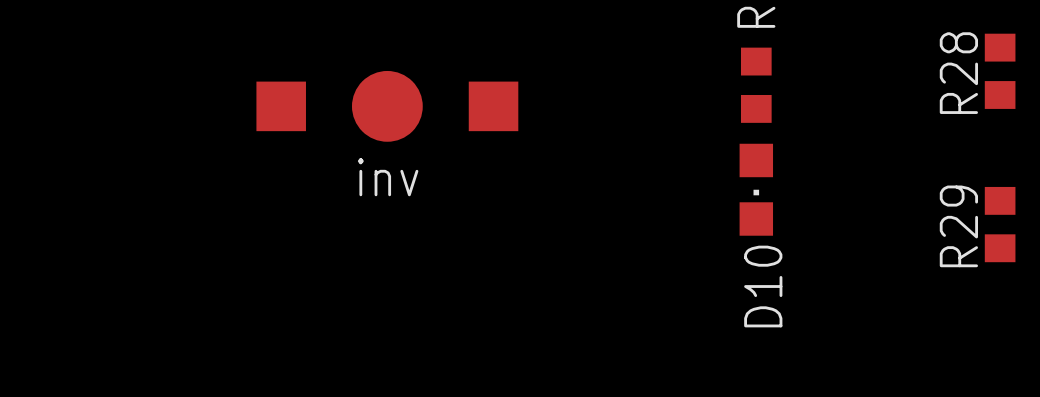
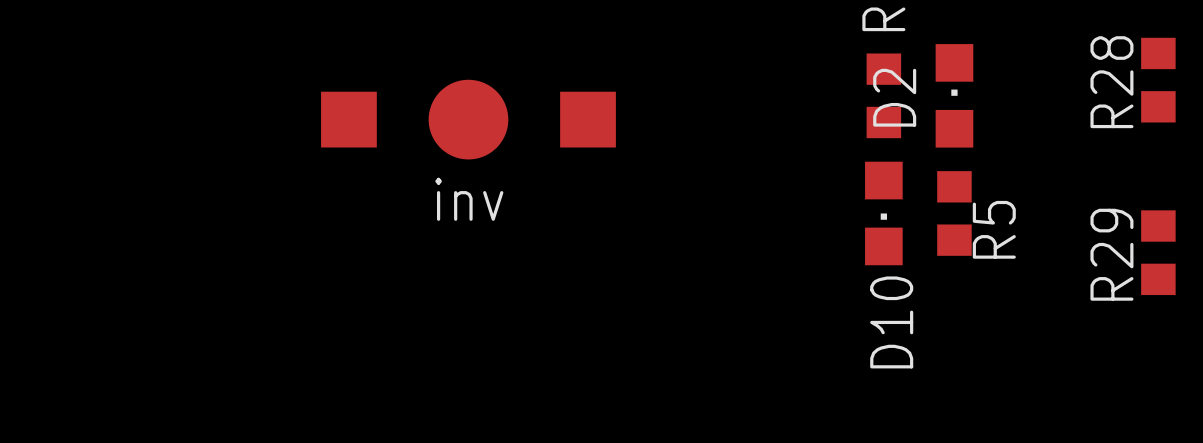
D2: none -> (954, 95)
R5: none -> (954, 213)

